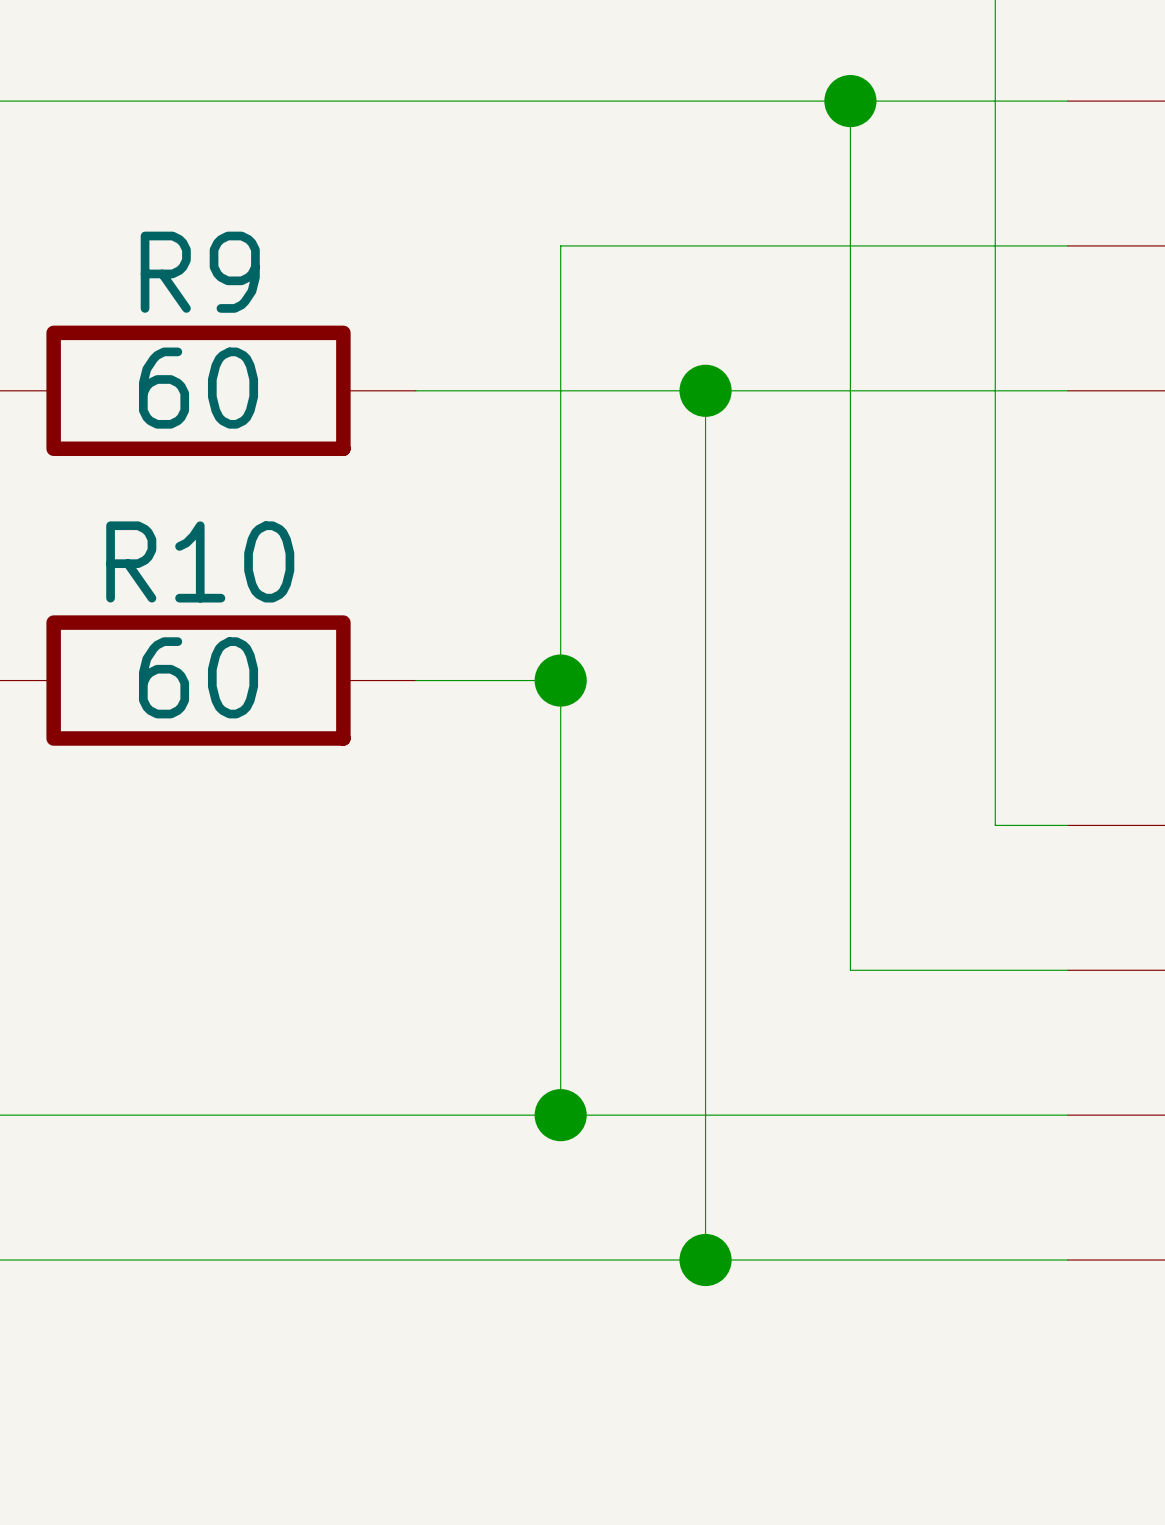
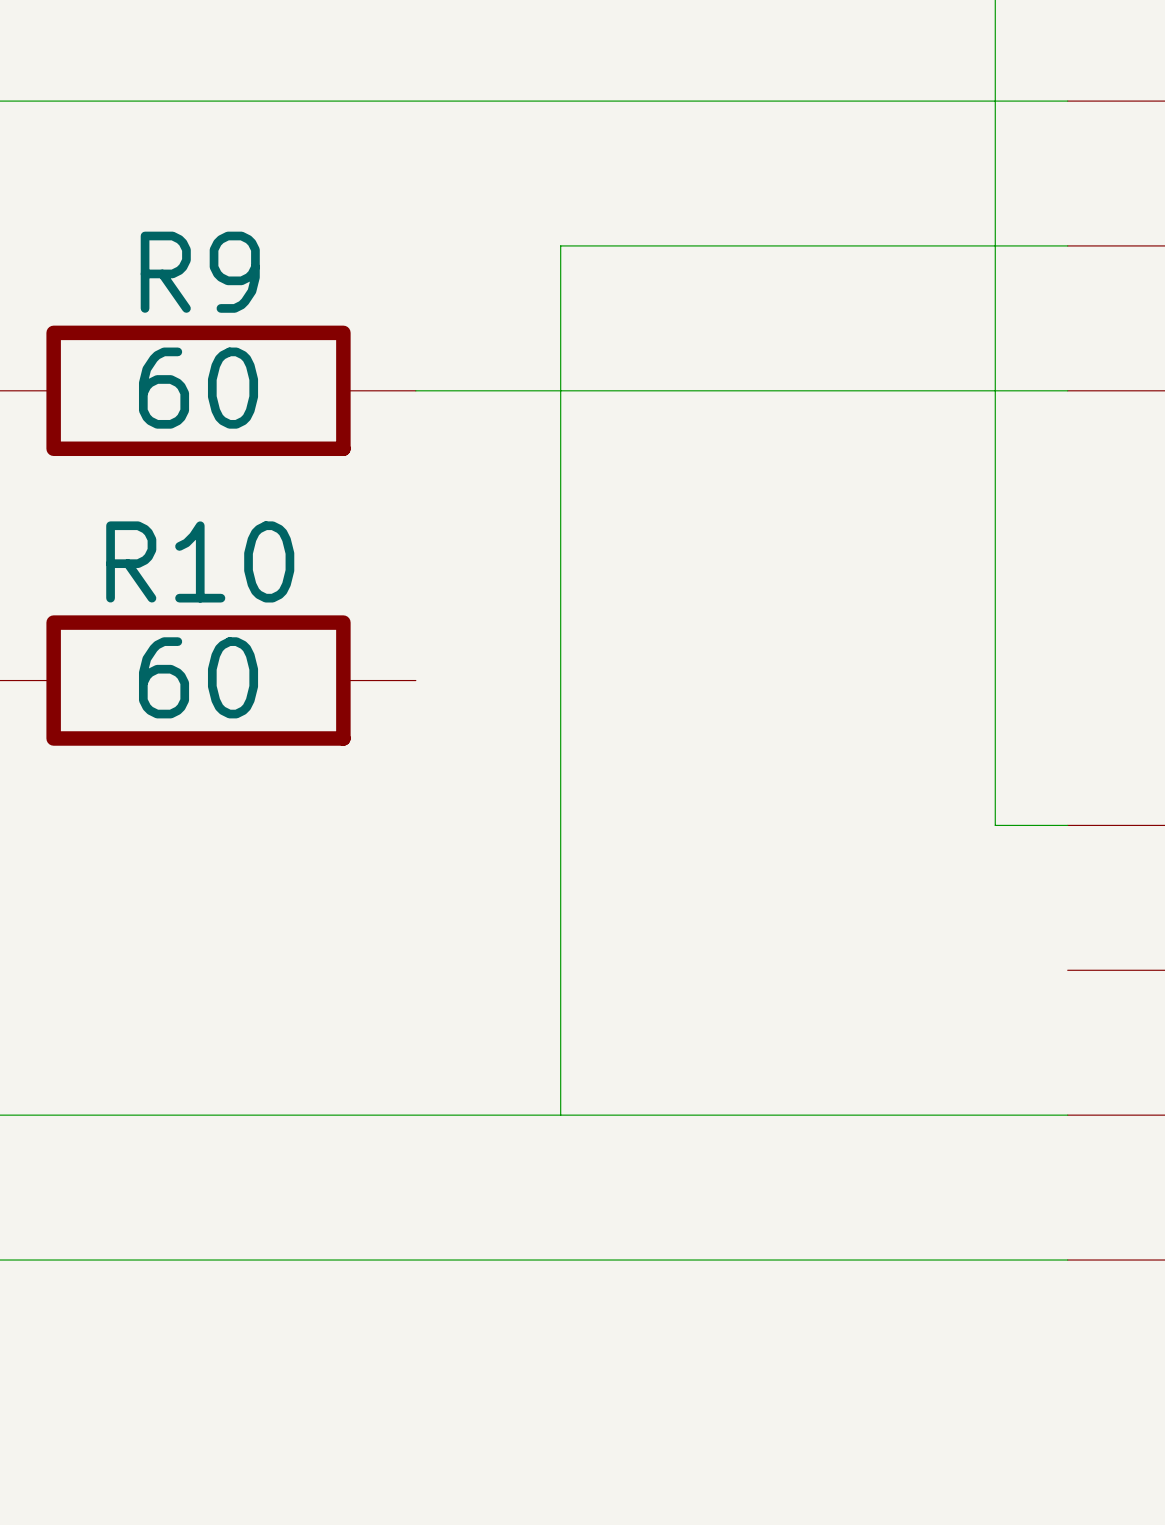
wire: (850, 101) (850, 970) (1067, 970) -> none
junction: (850, 101) -> none
wire: (705, 390) (705, 1260) -> none
junction: (705, 390) -> none
wire: (415, 680) (560, 680) -> none
junction: (560, 680) -> none
junction: (560, 1115) -> none
junction: (705, 1260) -> none

